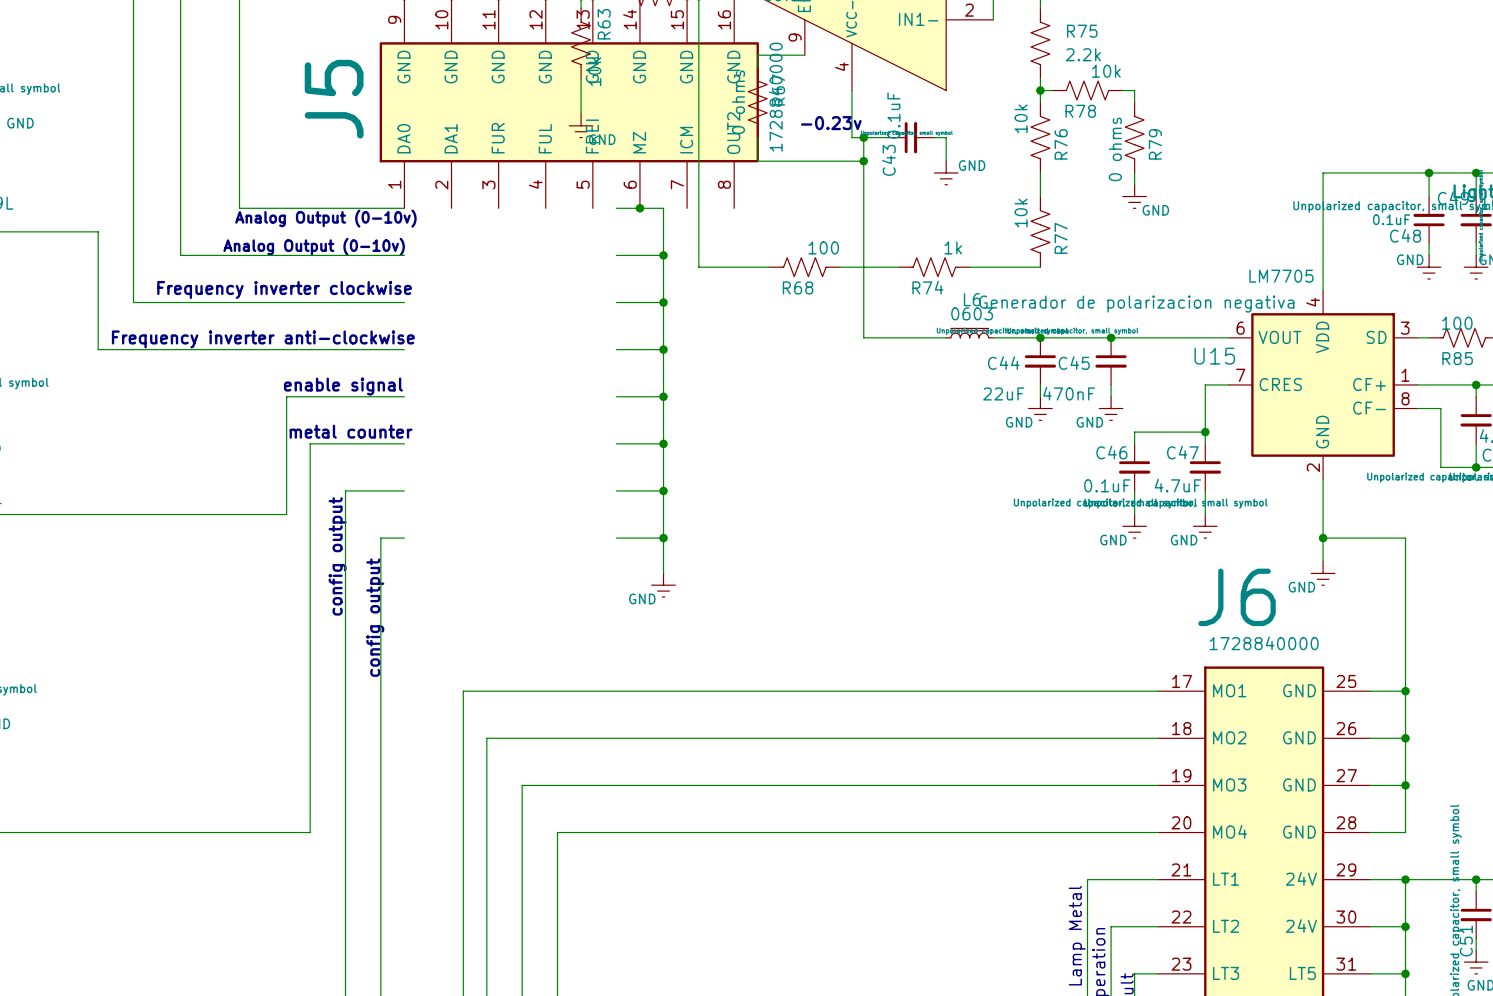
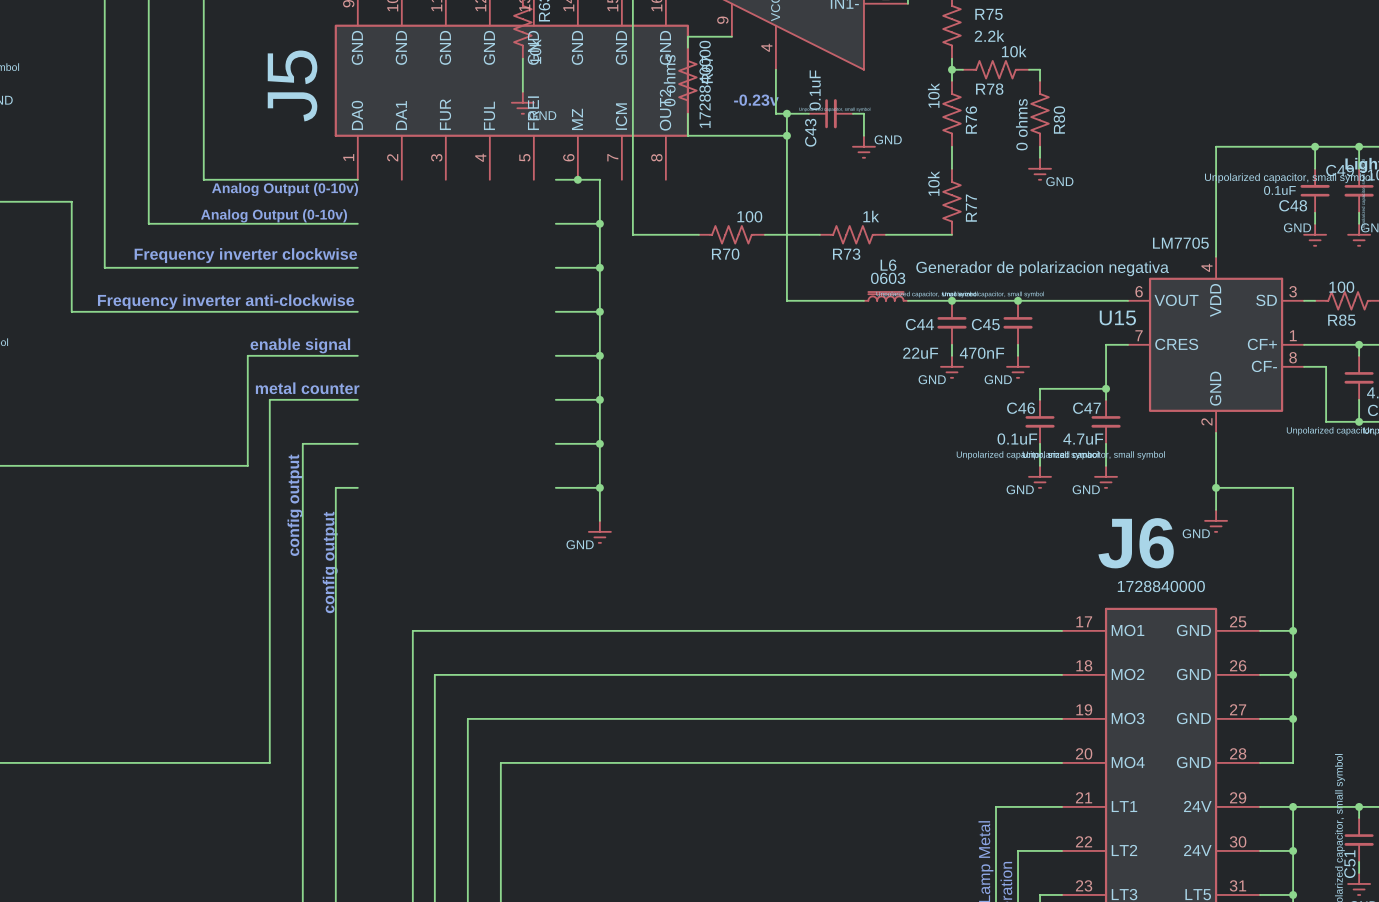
R79 name: R79 (1155, 144) -> R80 (1059, 120)
R68 name: R68 (798, 287) -> R70 (725, 254)
R74 name: R74 (927, 287) -> R73 (846, 254)

